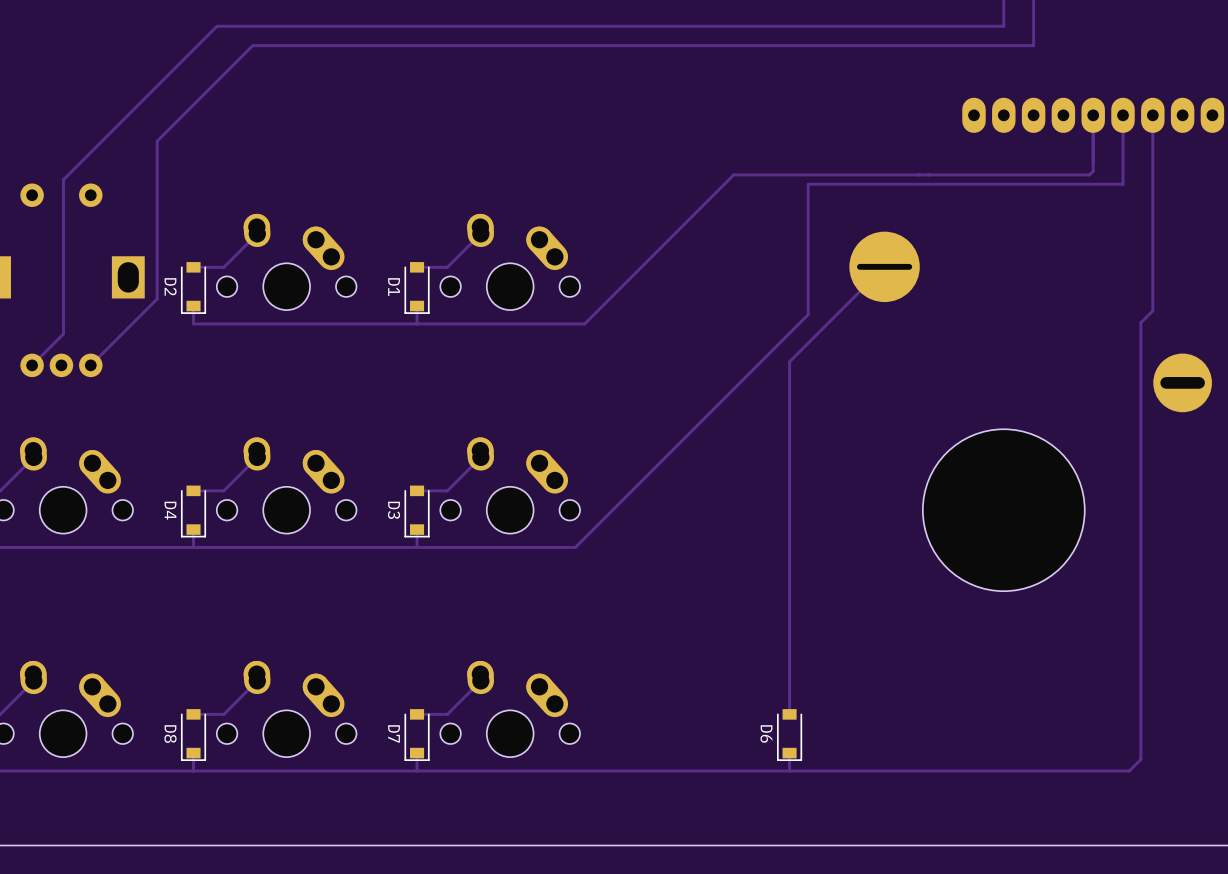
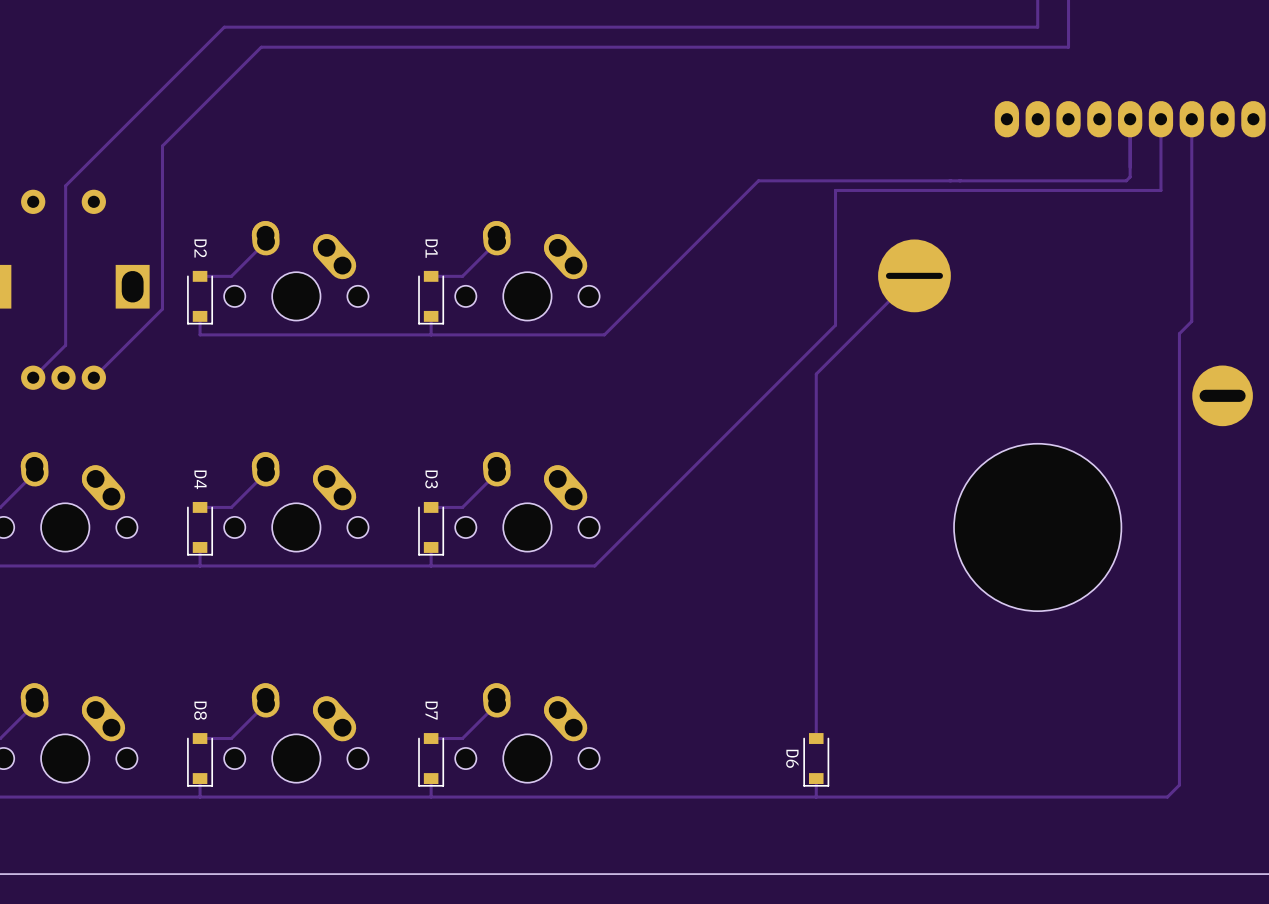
D2 name position: D2 (170, 286) -> D2 (200, 248)
D1 name position: D1 (394, 287) -> D1 (431, 248)
D4 name position: D4 (170, 510) -> D4 (200, 479)
D3 name position: D3 (394, 510) -> D3 (431, 479)
D7 name position: D7 (394, 733) -> D7 (431, 710)
D8 name position: D8 (170, 734) -> D8 (200, 710)

